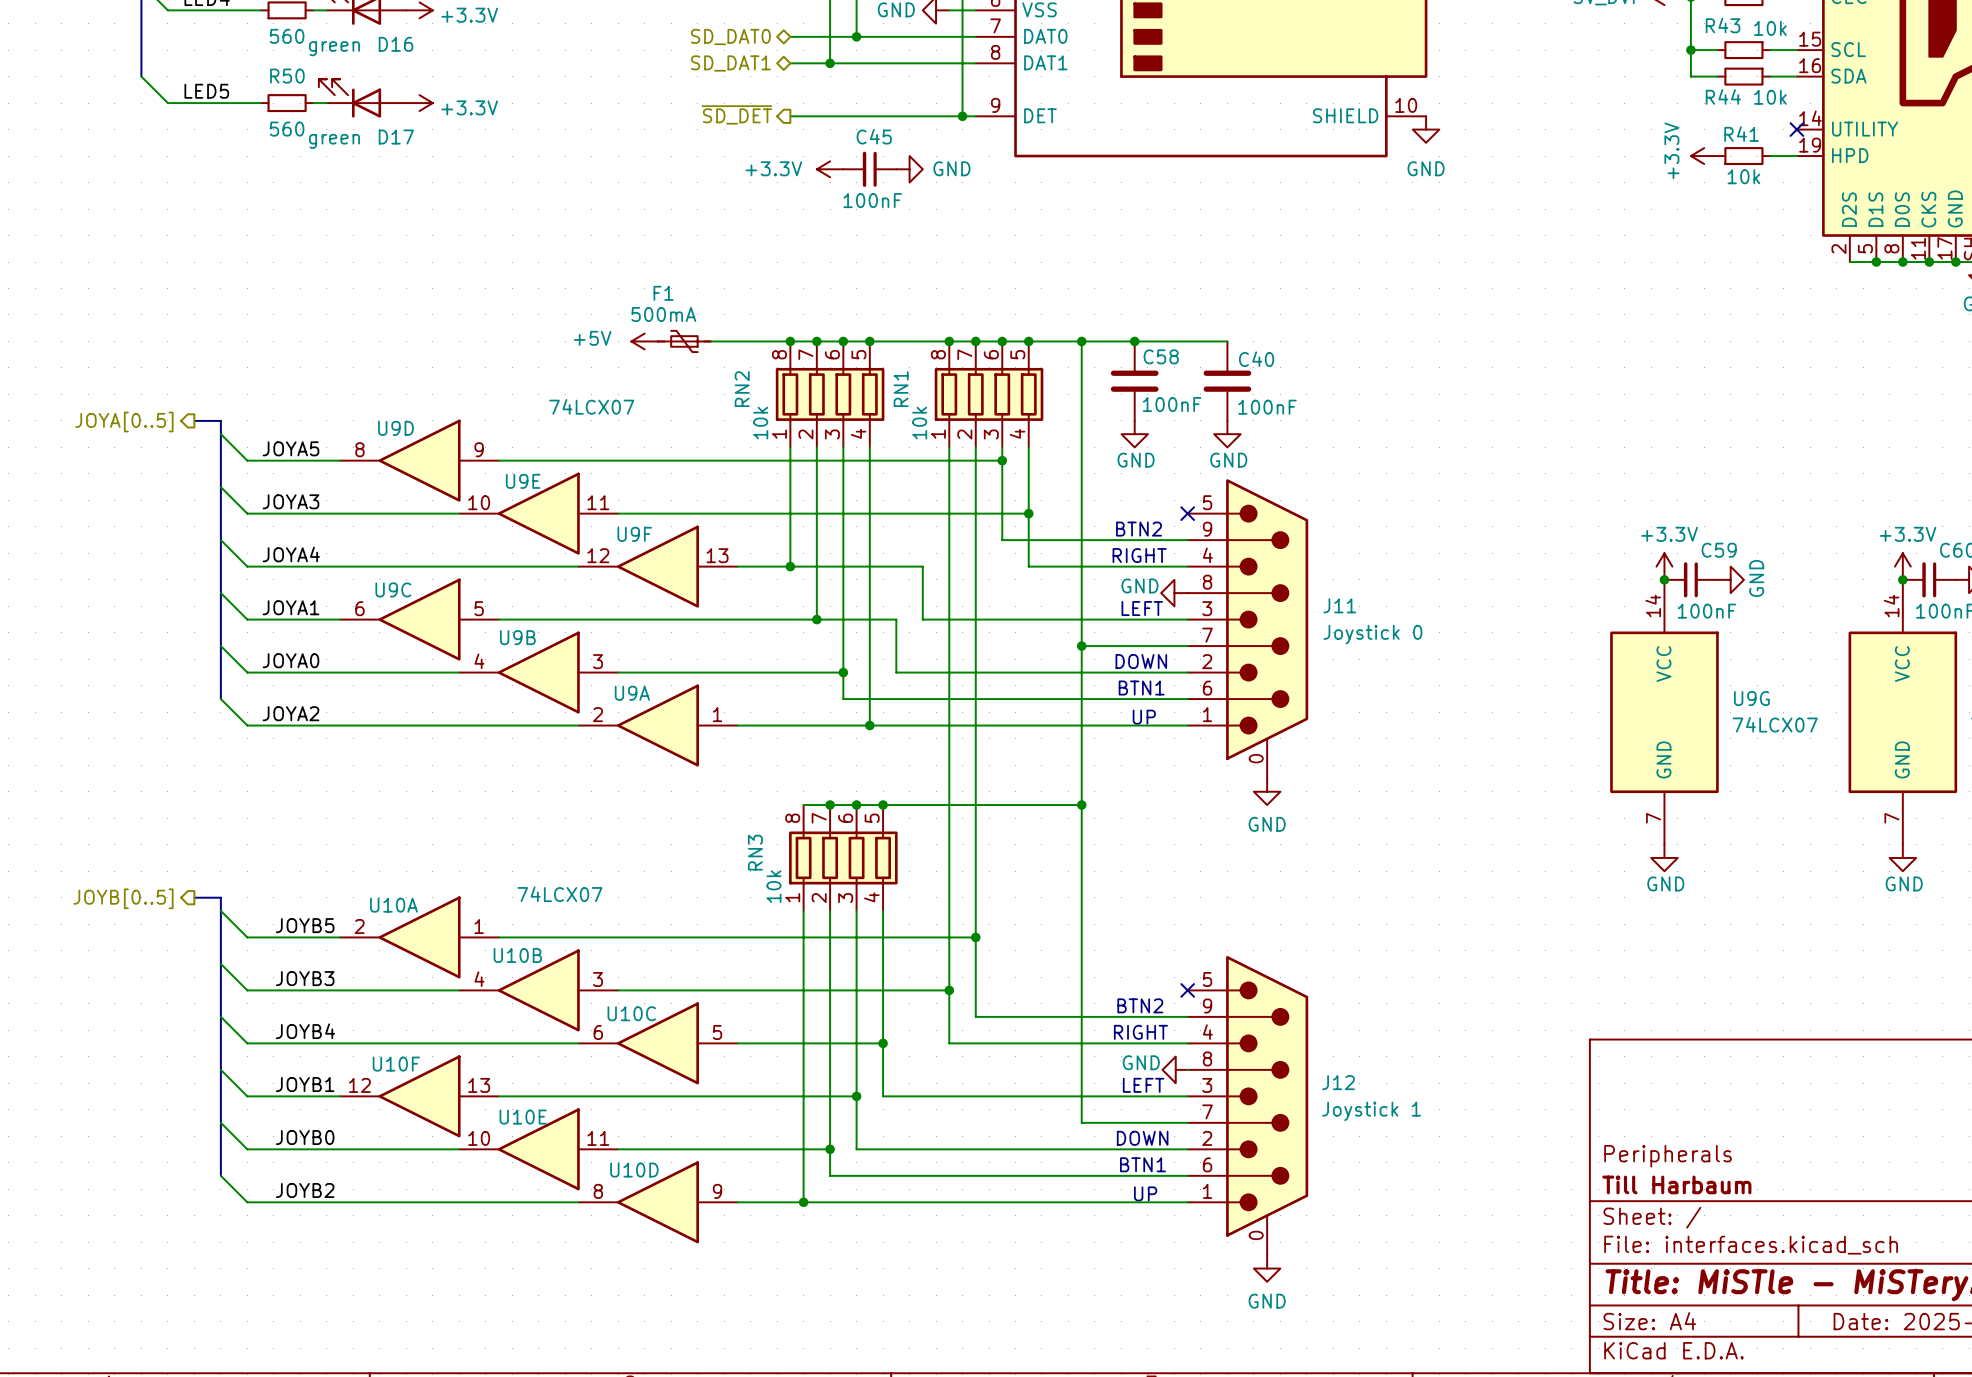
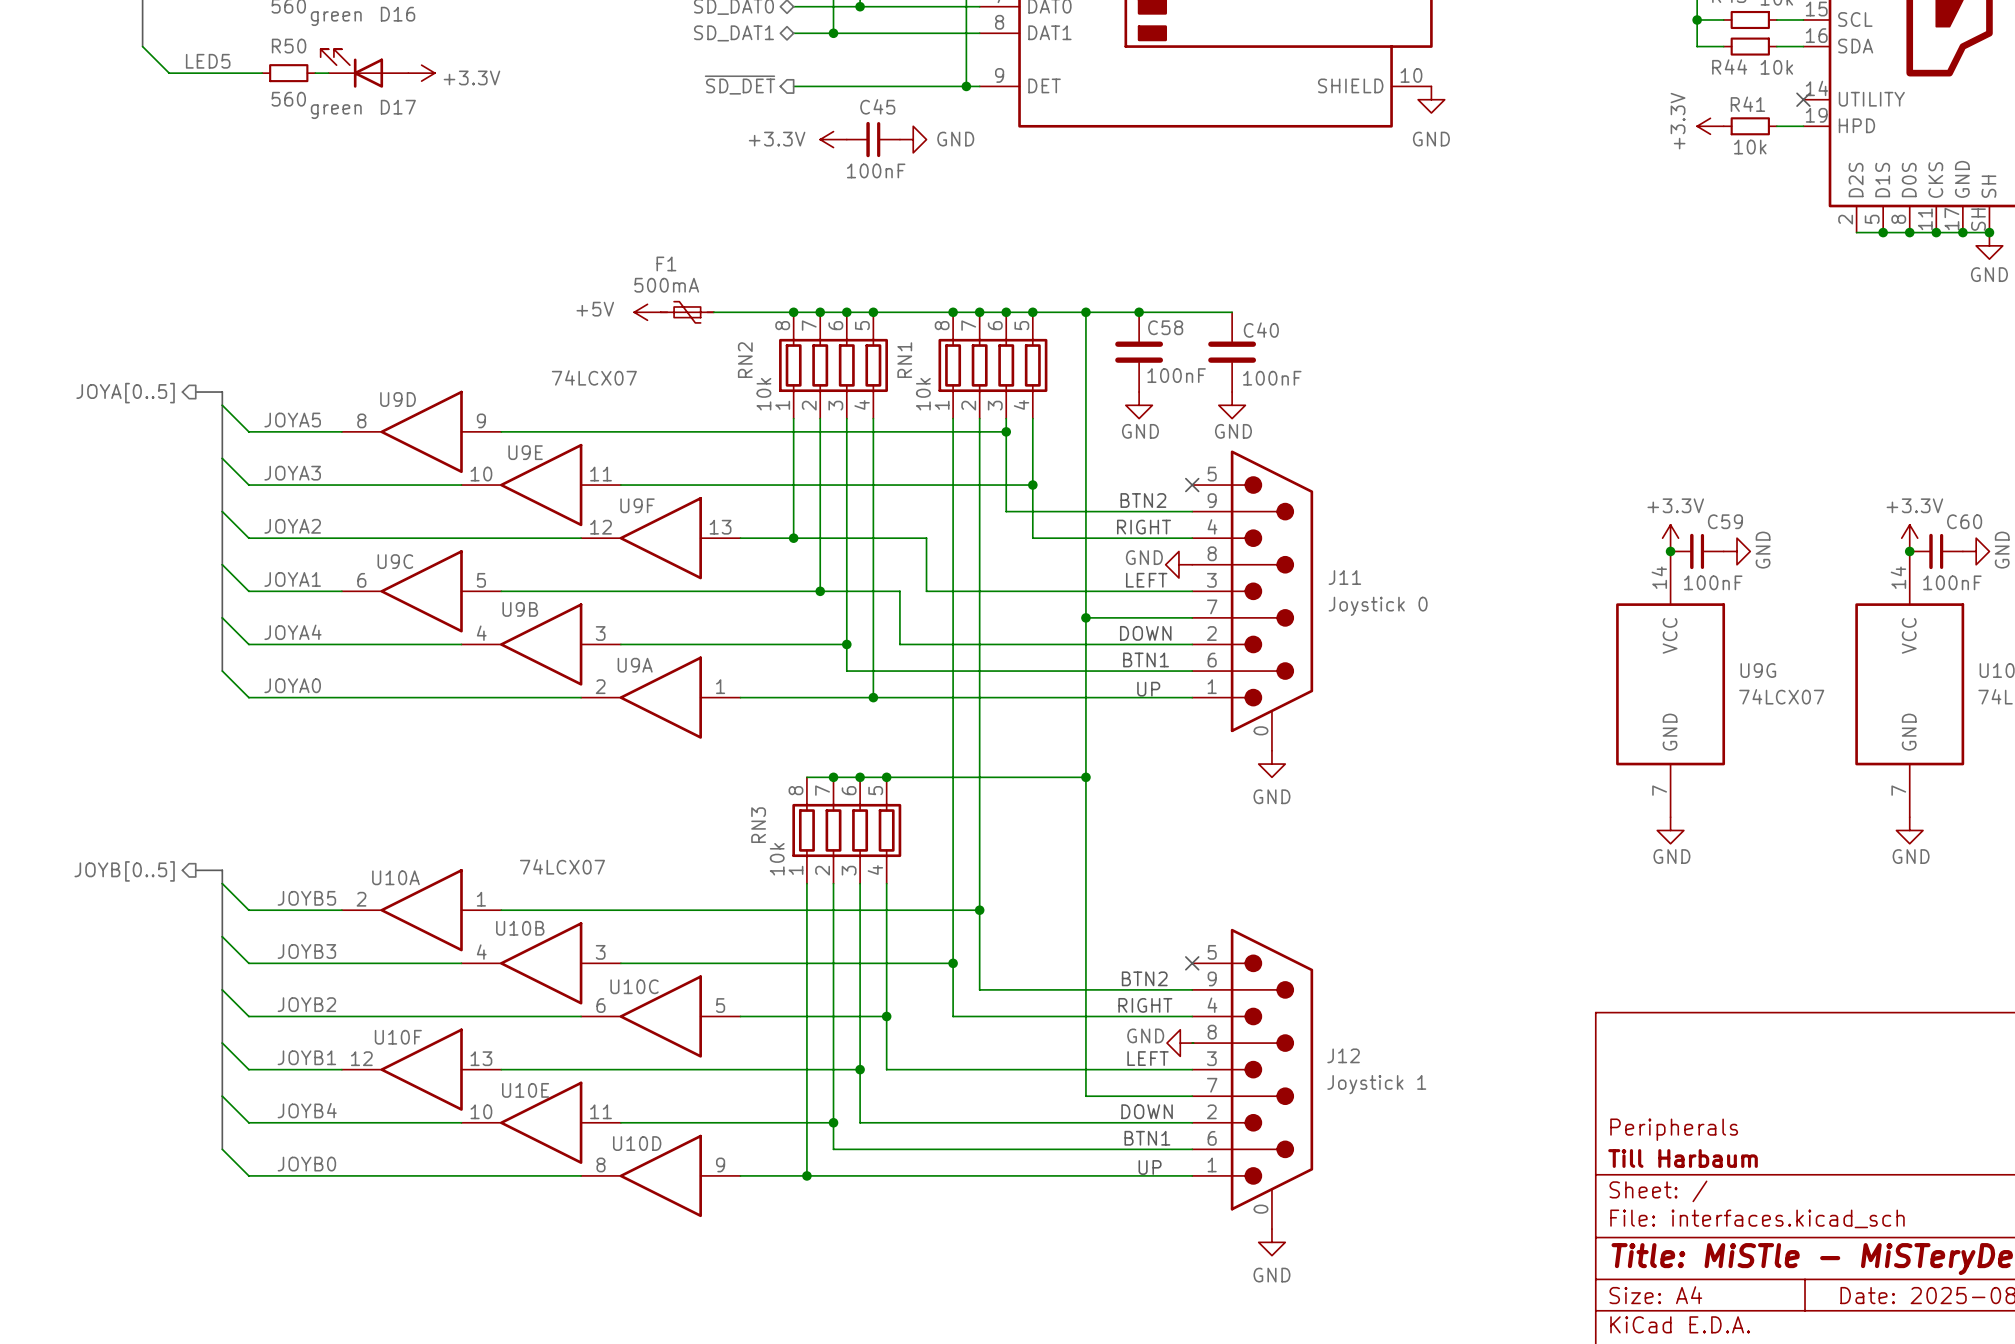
label: JOYA4 (291, 554) -> JOYA2 (292, 526)
label: JOYA0 (290, 660) -> JOYA4 (292, 632)
label: JOYA2 (290, 713) -> JOYA0 (292, 685)
label: JOYB4 (305, 1031) -> JOYB2 (306, 1004)
label: JOYB0 (305, 1137) -> JOYB4 (307, 1110)
label: JOYB2 (305, 1190) -> JOYB0 (306, 1164)

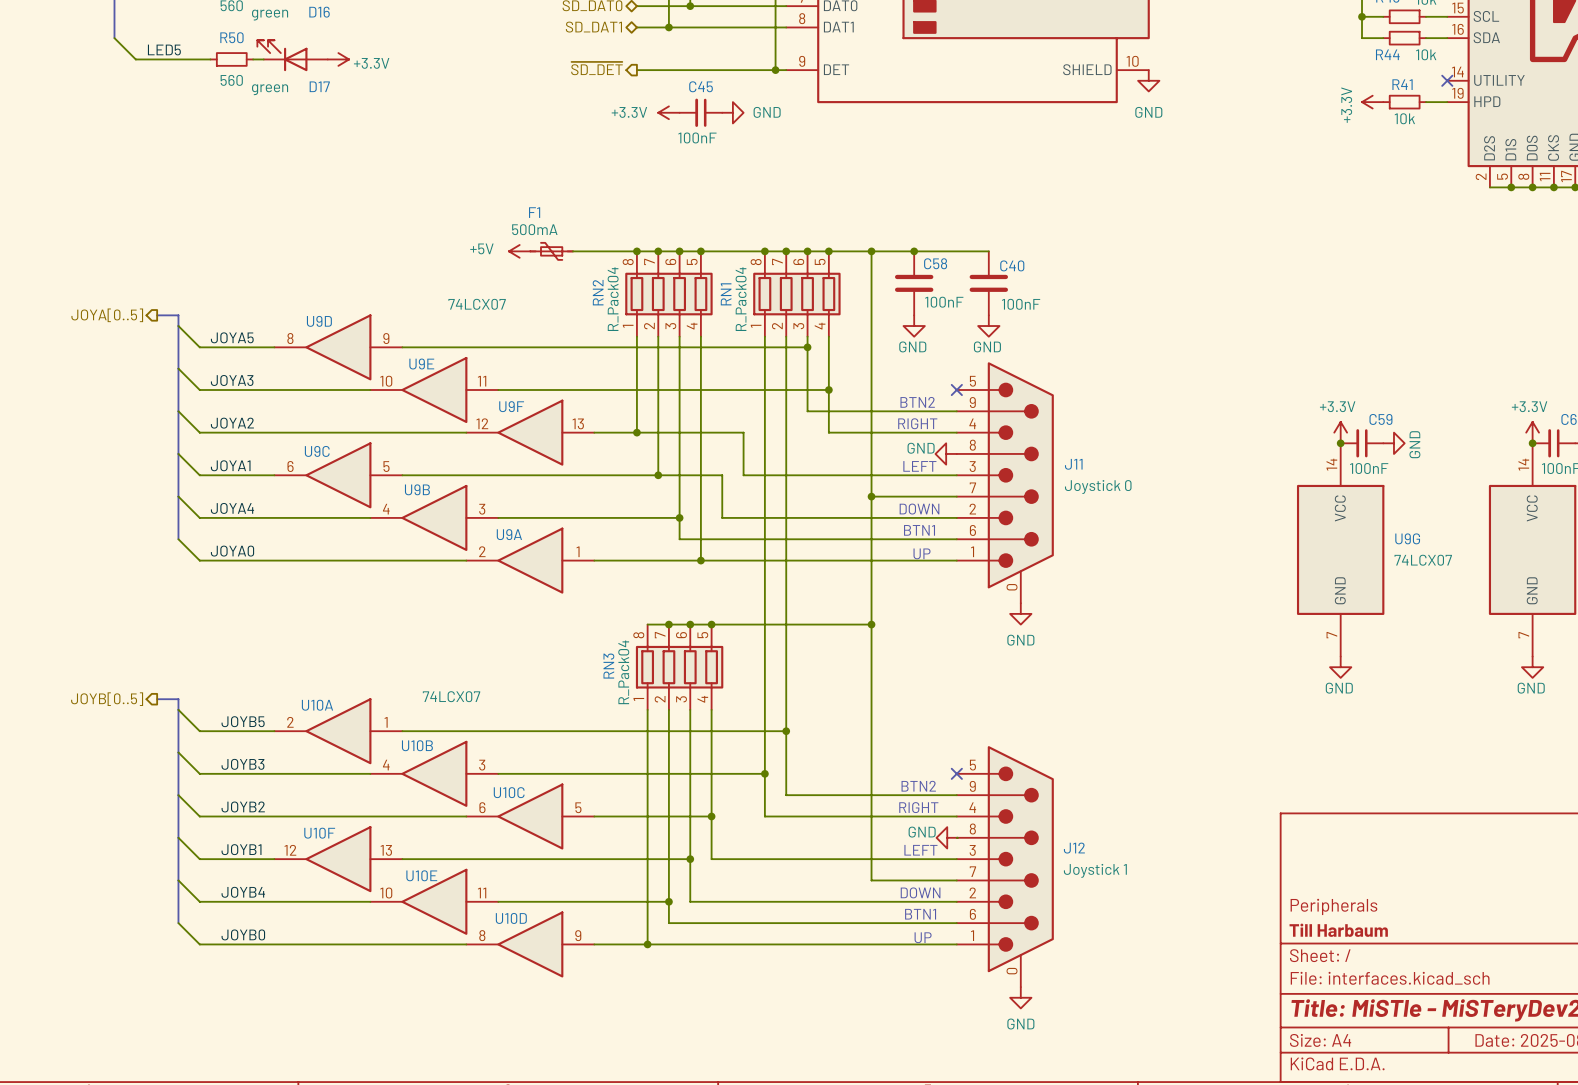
RN2 value: 10k (763, 394) -> R_Pack04 (613, 299)
RN1 value: 10k (923, 394) -> R_Pack04 (741, 299)
RN3 value: 10k (777, 859) -> R_Pack04 (623, 672)

